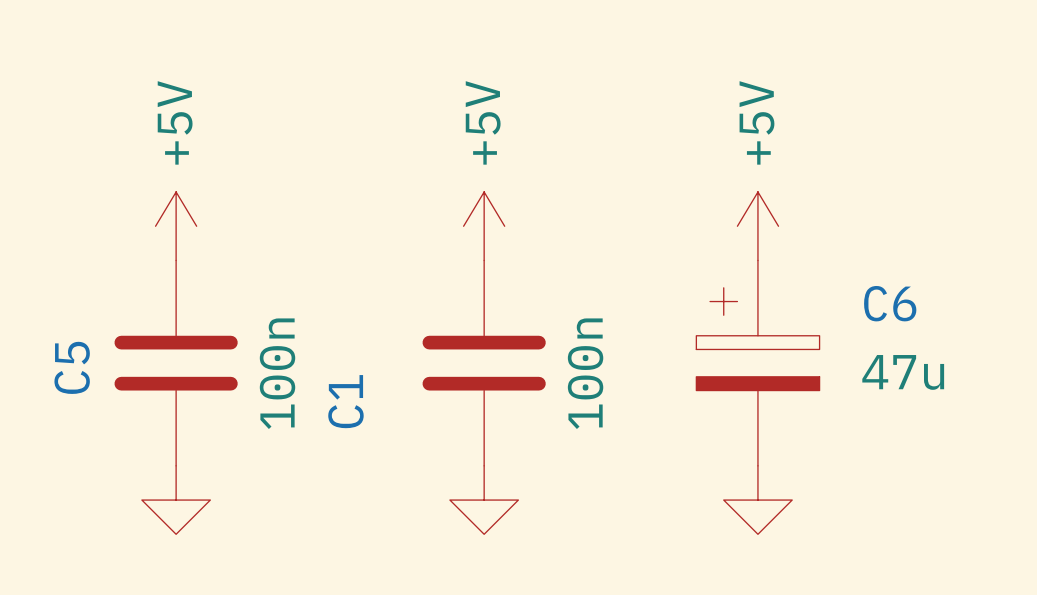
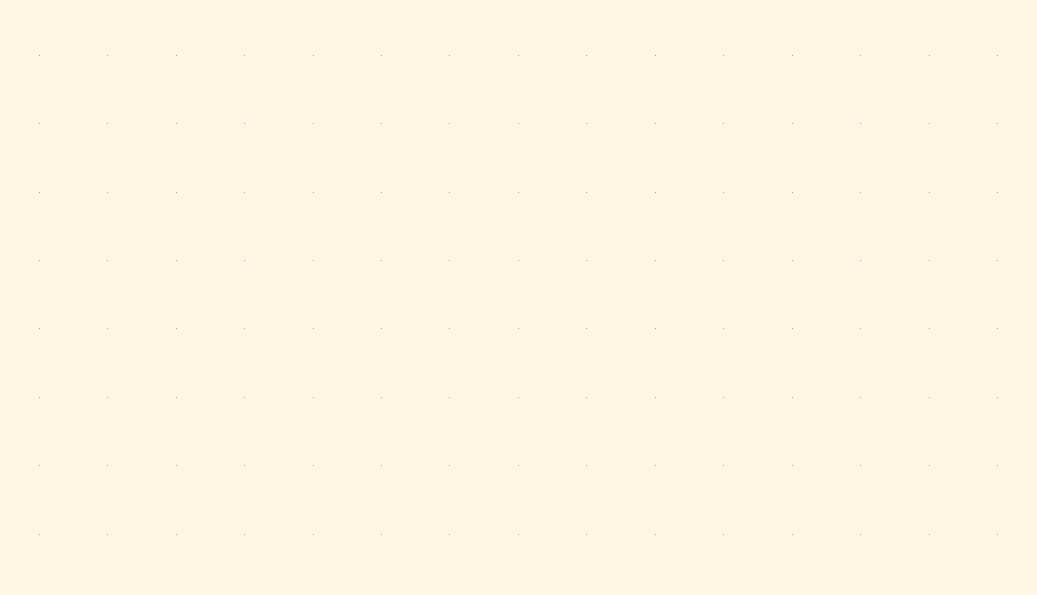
power symbol: +5V (176, 226) -> none
power symbol: +5V (484, 226) -> none
power symbol: +5V (757, 226) -> none
C5: 100n (176, 363) -> none
C1: 100n (484, 363) -> none
C6: 47u (757, 363) -> none
power symbol: (176, 500) -> none
power symbol: (484, 500) -> none
power symbol: (757, 500) -> none

